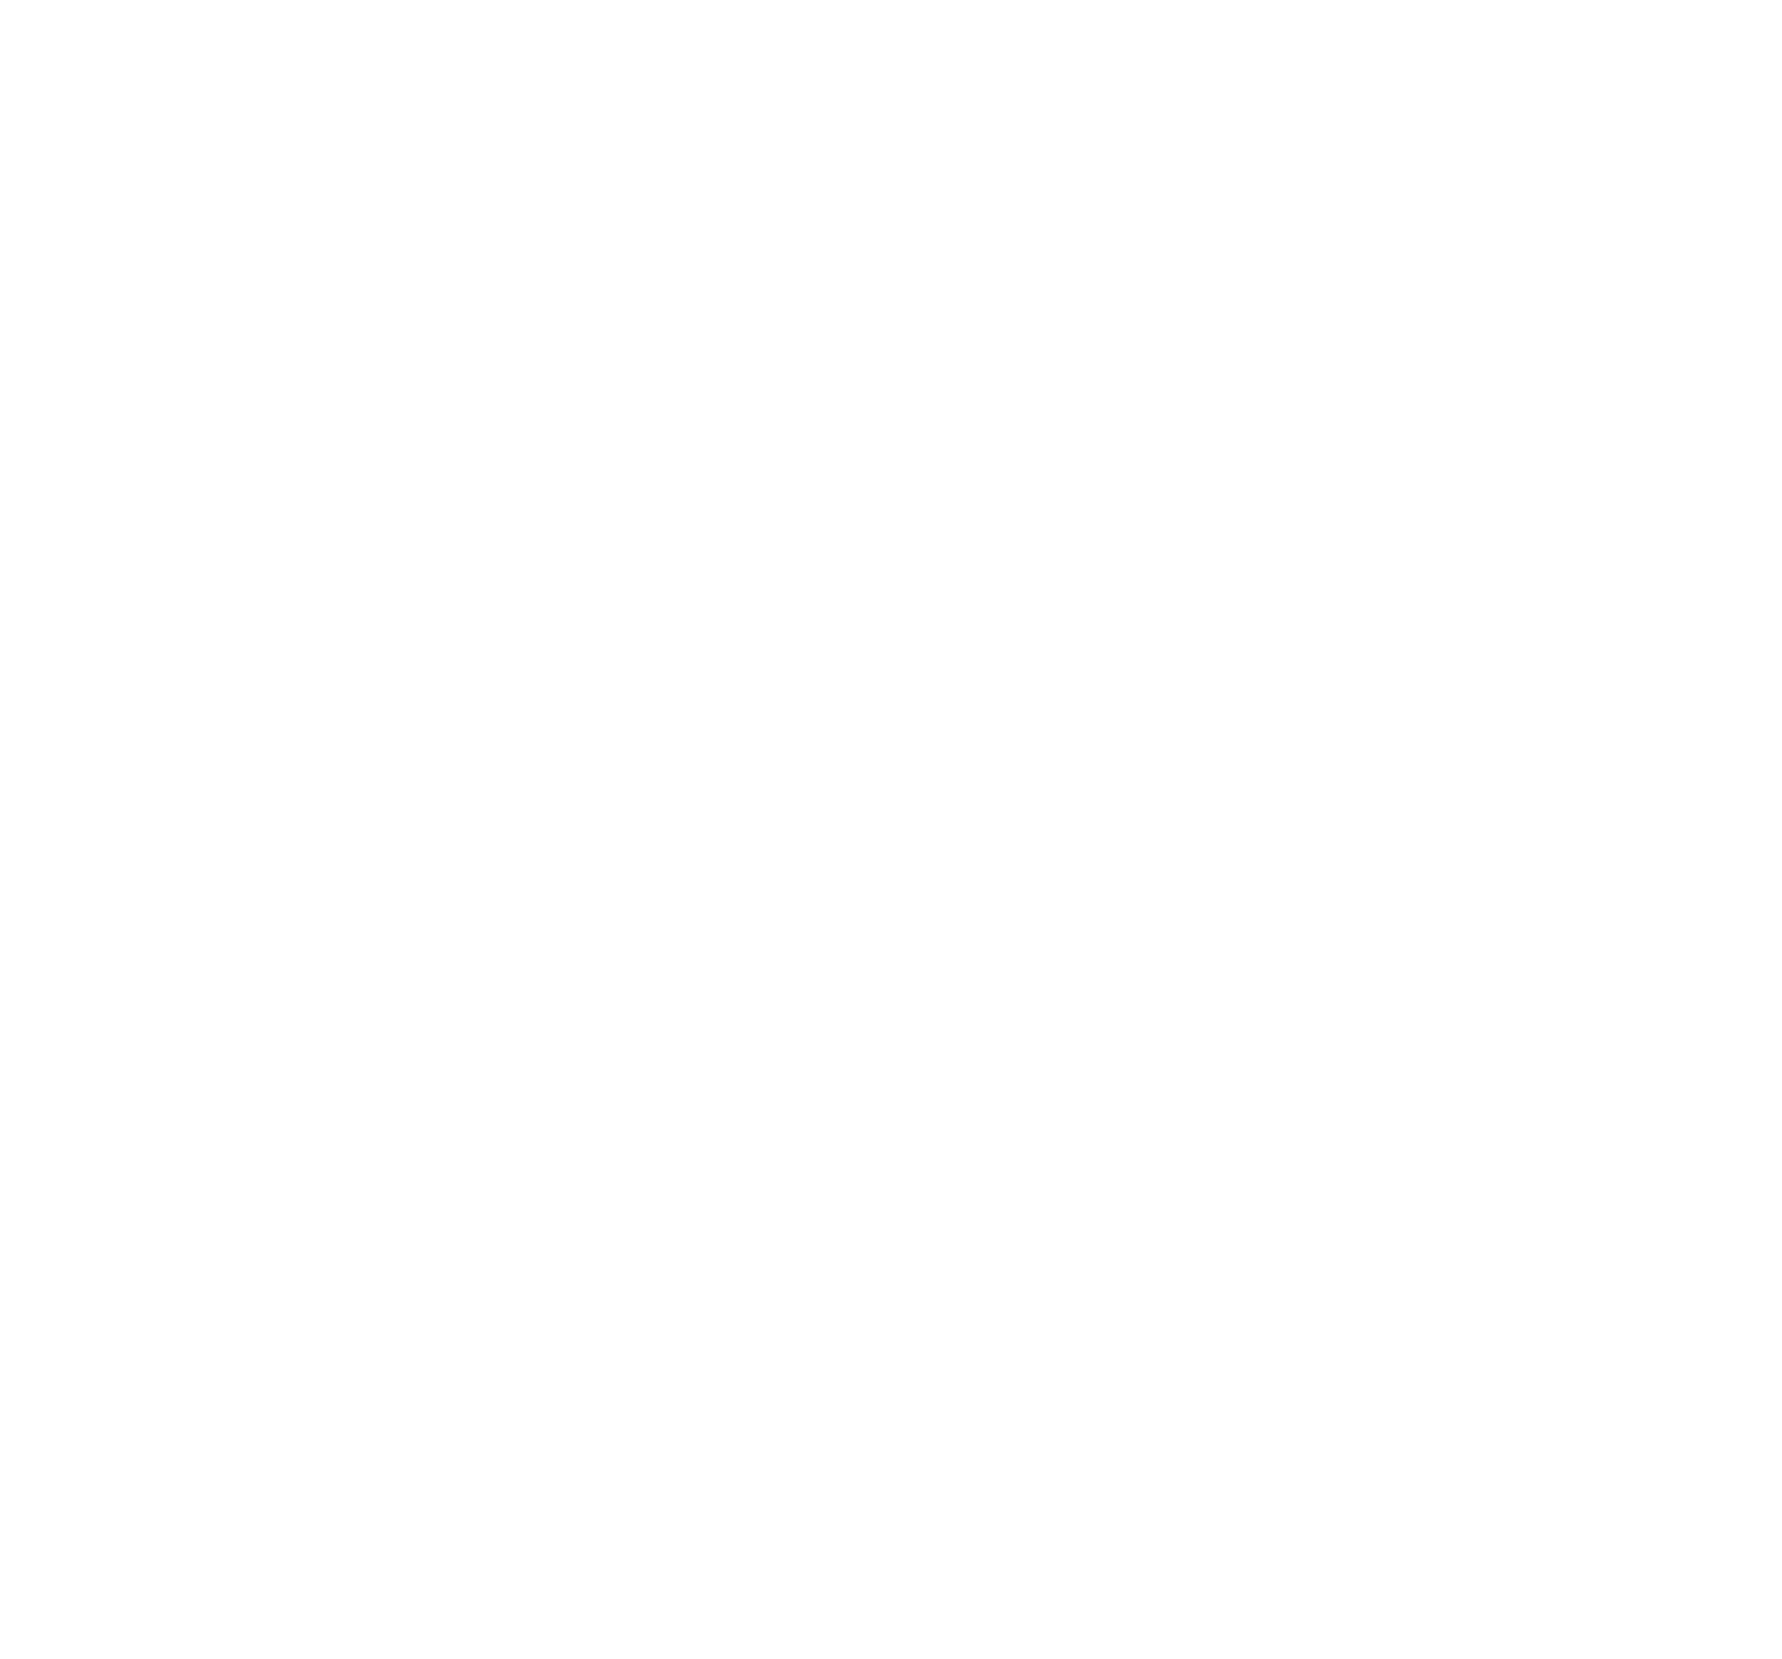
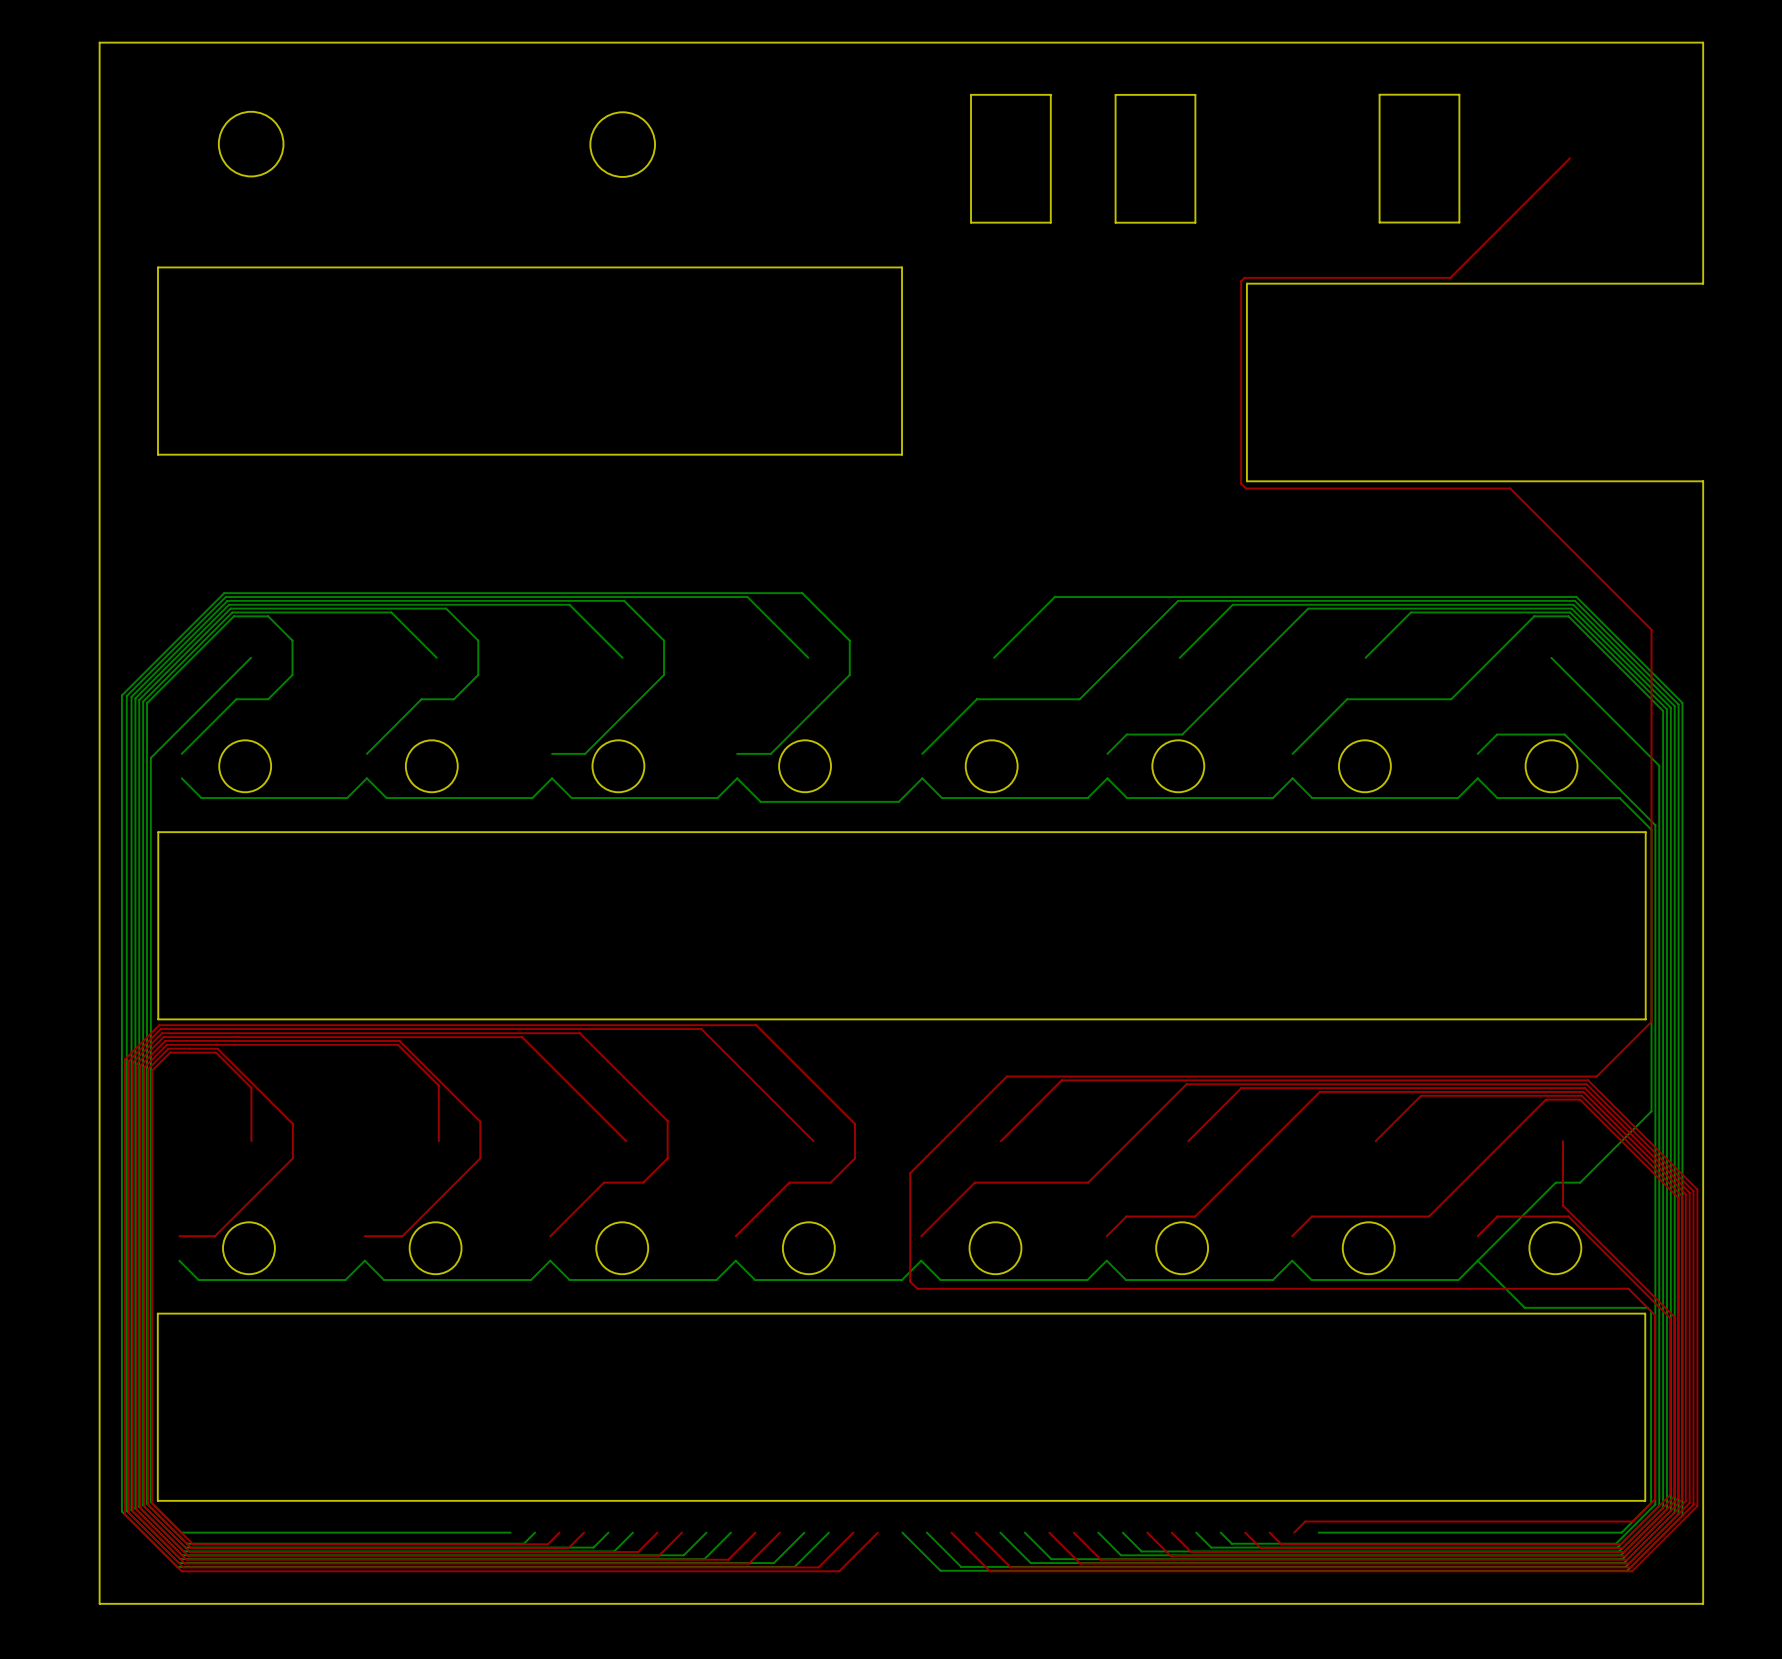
board edge: none -> (99, 42) (1703, 42) (1703, 283) (1246, 283) (1246, 481) (1703, 481) (1703, 1603) (99, 1603) (99, 42)
board edge: none -> (971, 94) (1050, 94) (1050, 222) (971, 222) (971, 94)
board edge: none -> (1115, 94) (1195, 94) (1195, 222) (1115, 222) (1115, 94)
board edge: none -> (1379, 94) (1459, 94) (1459, 222) (1379, 222) (1379, 94)
round board edge: none -> [218, 111, 284, 177]
round board edge: none -> [590, 112, 656, 178]
top track: none -> (1569, 158) (1450, 277) (1244, 277) (1241, 281) (1241, 483) (1245, 488) (1510, 488) (1651, 629) (1651, 1021) (1596, 1076) (1006, 1076) (910, 1173) (910, 1281) (917, 1288) (1628, 1288) (1654, 1315) (1654, 1499) (1632, 1521) (1305, 1521) (1294, 1532)
board edge: none -> (157, 267) (902, 267) (902, 454) (157, 454) (157, 267)
bottom track: none -> (251, 657) (150, 757) (150, 1502) (181, 1532) (510, 1532)
bottom track: none -> (436, 657) (391, 612) (232, 612) (143, 701) (143, 1505) (185, 1547) (593, 1547) (608, 1532)
bottom track: none -> (622, 657) (569, 604) (229, 604) (135, 698) (135, 1508) (182, 1555) (683, 1555) (706, 1532)
bottom track: none -> (808, 657) (747, 597) (225, 597) (126, 696) (126, 1510) (179, 1563) (774, 1563) (804, 1532)
bottom track: none -> (994, 657) (1054, 597) (1576, 597) (1682, 702) (1682, 1515) (1627, 1570) (940, 1570) (902, 1532)
bottom track: none -> (1179, 657) (1232, 604) (1573, 604) (1674, 706) (1674, 1512) (1624, 1563) (1030, 1563) (1000, 1532)
bottom track: none -> (1365, 657) (1410, 612) (1570, 612) (1666, 709) (1666, 1509) (1620, 1555) (1121, 1555) (1098, 1532)
bottom track: none -> (1551, 657) (1659, 765) (1659, 1505) (1617, 1547) (1211, 1547) (1196, 1532)
round board edge: none -> [218, 740, 272, 793]
round board edge: none -> [405, 740, 458, 793]
round board edge: none -> [592, 740, 645, 793]
round board edge: none -> [778, 740, 832, 793]
round board edge: none -> [965, 740, 1018, 793]
round board edge: none -> [1152, 740, 1205, 793]
round board edge: none -> [1338, 740, 1392, 793]
round board edge: none -> [1525, 740, 1578, 793]
bottom track: none -> (181, 753) (236, 699) (268, 699) (292, 674) (292, 640) (268, 616) (233, 616) (146, 703) (146, 1503) (187, 1543) (523, 1543) (535, 1532)
bottom track: none -> (366, 753) (421, 699) (453, 699) (478, 674) (478, 640) (446, 608) (230, 608) (139, 700) (139, 1506) (183, 1551) (614, 1551) (633, 1532)
bottom track: none -> (552, 753) (585, 753) (664, 674) (664, 640) (624, 600) (227, 600) (131, 696) (131, 1510) (180, 1559) (704, 1559) (730, 1532)
bottom track: none -> (737, 753) (770, 753) (849, 674) (849, 640) (802, 593) (224, 593) (121, 695) (121, 1511) (177, 1566) (794, 1566) (828, 1532)
bottom track: none -> (922, 753) (976, 699) (1079, 699) (1178, 600) (1574, 600) (1678, 704) (1678, 1513) (1625, 1566) (961, 1566) (926, 1532)
bottom track: none -> (1107, 753) (1126, 734) (1182, 734) (1308, 608) (1571, 608) (1670, 707) (1670, 1510) (1622, 1559) (1051, 1559) (1024, 1532)
bottom track: none -> (1292, 753) (1347, 699) (1451, 699) (1534, 616) (1568, 616) (1663, 710) (1663, 1507) (1619, 1551) (1141, 1551) (1122, 1532)
bottom track: none -> (1477, 753) (1497, 734) (1564, 734) (1655, 825) (1655, 1504) (1616, 1543) (1231, 1543) (1220, 1532)
bottom track: none -> (181, 778) (201, 798) (347, 798) (366, 778) (386, 798) (532, 798) (552, 778) (571, 798) (717, 798) (737, 778) (760, 801) (898, 801) (922, 778) (941, 798) (1087, 798) (1107, 778) (1127, 798) (1272, 798) (1292, 778) (1312, 798) (1458, 798) (1477, 778) (1497, 798) (1619, 798) (1651, 829) (1651, 1111) (1580, 1182) (1555, 1182) (1458, 1280) (1311, 1280) (1292, 1260) (1272, 1280) (1126, 1280) (1106, 1260) (1087, 1280) (940, 1280) (921, 1260) (901, 1280) (755, 1280) (735, 1260) (716, 1280) (569, 1280) (550, 1260) (531, 1280) (384, 1280) (364, 1260) (345, 1280) (198, 1280) (179, 1260)
board edge: none -> (158, 832) (1645, 832) (1645, 1019) (158, 1019) (158, 832)
top track: none -> (237, 1037) (163, 1037) (136, 1064) (136, 1509) (186, 1559) (728, 1559) (755, 1532)
top track: none -> (237, 1037) (522, 1037) (626, 1141)
top track: none -> (235, 1040) (165, 1040) (140, 1065) (140, 1508) (188, 1555) (658, 1555) (682, 1532)
top track: none -> (235, 1040) (399, 1040) (480, 1121) (480, 1158) (402, 1236) (364, 1236)
top track: none -> (234, 1044) (166, 1044) (144, 1067) (144, 1506) (189, 1551) (638, 1551) (657, 1532)
top track: none -> (234, 1044) (398, 1044) (438, 1085) (438, 1141)
top track: none -> (251, 1141) (251, 1087) (216, 1052) (170, 1052) (152, 1070) (152, 1503) (192, 1544) (547, 1544) (559, 1532)
top track: none -> (813, 1141) (701, 1029) (160, 1029) (128, 1061) (128, 1512) (183, 1567) (818, 1567) (853, 1532)
top track: none -> (1000, 1141) (1061, 1080) (1588, 1080) (1697, 1189) (1697, 1506) (1632, 1571) (990, 1571) (951, 1532)
top track: none -> (1188, 1141) (1241, 1088) (1585, 1088) (1689, 1192) (1689, 1502) (1629, 1563) (1080, 1563) (1049, 1532)
top track: none -> (1375, 1141) (1421, 1095) (1581, 1095) (1681, 1195) (1681, 1499) (1625, 1555) (1170, 1555) (1147, 1532)
top track: none -> (1563, 1141) (1563, 1205) (1674, 1316) (1674, 1496) (1622, 1548) (1260, 1548) (1245, 1532)
round board edge: none -> [222, 1222, 276, 1275]
round board edge: none -> [409, 1222, 462, 1275]
round board edge: none -> [596, 1222, 649, 1275]
round board edge: none -> [782, 1222, 836, 1275]
round board edge: none -> [969, 1222, 1022, 1275]
round board edge: none -> [1155, 1222, 1209, 1275]
round board edge: none -> [1342, 1222, 1395, 1275]
round board edge: none -> [1529, 1222, 1582, 1275]
top track: none -> (179, 1236) (215, 1236) (292, 1158) (292, 1123) (217, 1048) (168, 1048) (148, 1069) (148, 1504) (191, 1548) (568, 1548) (584, 1532)
top track: none -> (550, 1236) (603, 1182) (643, 1182) (667, 1158) (667, 1121) (579, 1033) (162, 1033) (132, 1062) (132, 1511) (184, 1563) (749, 1563) (779, 1532)
top track: none -> (735, 1236) (789, 1182) (830, 1182) (855, 1158) (855, 1123) (756, 1025) (159, 1025) (124, 1059) (124, 1514) (181, 1571) (839, 1571) (877, 1532)
top track: none -> (921, 1236) (974, 1182) (1088, 1182) (1186, 1084) (1586, 1084) (1693, 1191) (1693, 1504) (1630, 1567) (1010, 1567) (975, 1532)
top track: none -> (1106, 1236) (1126, 1216) (1195, 1216) (1319, 1091) (1583, 1091) (1685, 1194) (1685, 1501) (1627, 1559) (1100, 1559) (1073, 1532)
top track: none -> (1292, 1236) (1311, 1216) (1429, 1216) (1545, 1099) (1580, 1099) (1678, 1197) (1678, 1498) (1624, 1551) (1191, 1551) (1171, 1532)
top track: none -> (1477, 1236) (1497, 1216) (1568, 1216) (1670, 1318) (1670, 1494) (1620, 1544) (1281, 1544) (1269, 1532)
bottom track: none -> (1477, 1260) (1524, 1307) (1647, 1307) (1651, 1311) (1651, 1503) (1621, 1532) (1318, 1532)
board edge: none -> (157, 1313) (1645, 1313) (1645, 1500) (157, 1500) (157, 1313)

